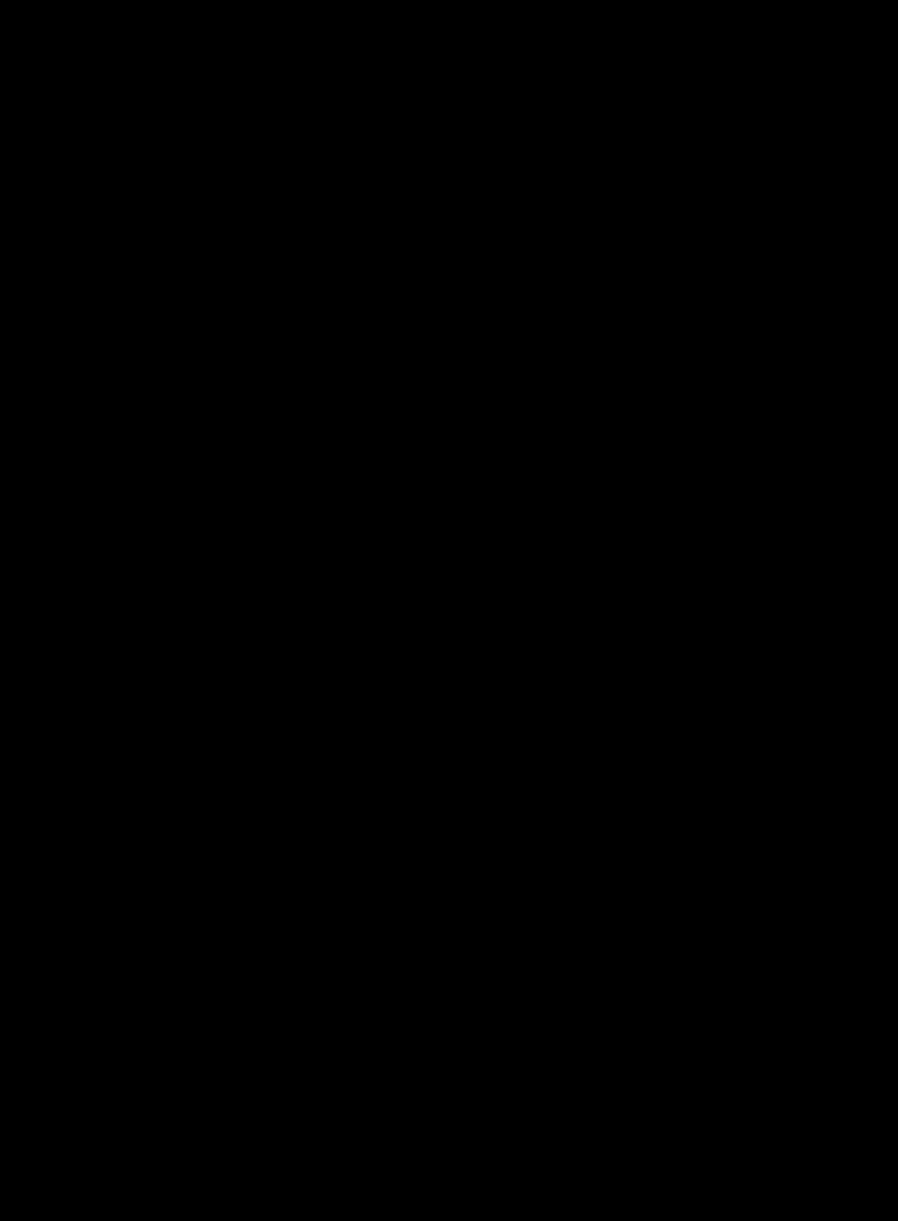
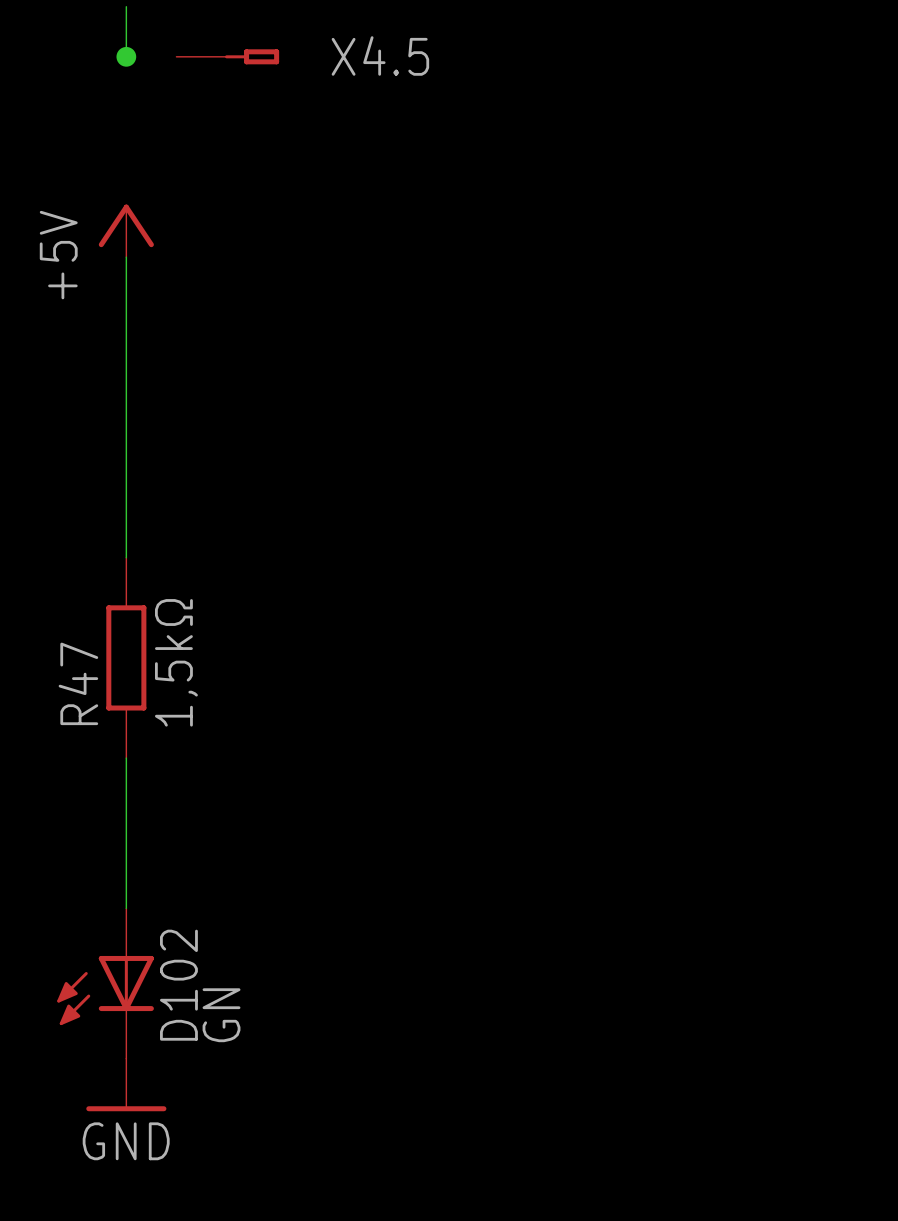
wire: none -> (126, 6) (126, 56)
junction: none -> (126, 56)
X4.5: none -> (227, 56)
power symbol: none -> +5V (126, 230)
wire: none -> (126, 257) (126, 557)
R47: none -> 1,5kΩ (126, 657)
wire: none -> (126, 758) (126, 908)
D102: none -> GN (105, 983)
power symbol: none -> GND (126, 1084)

